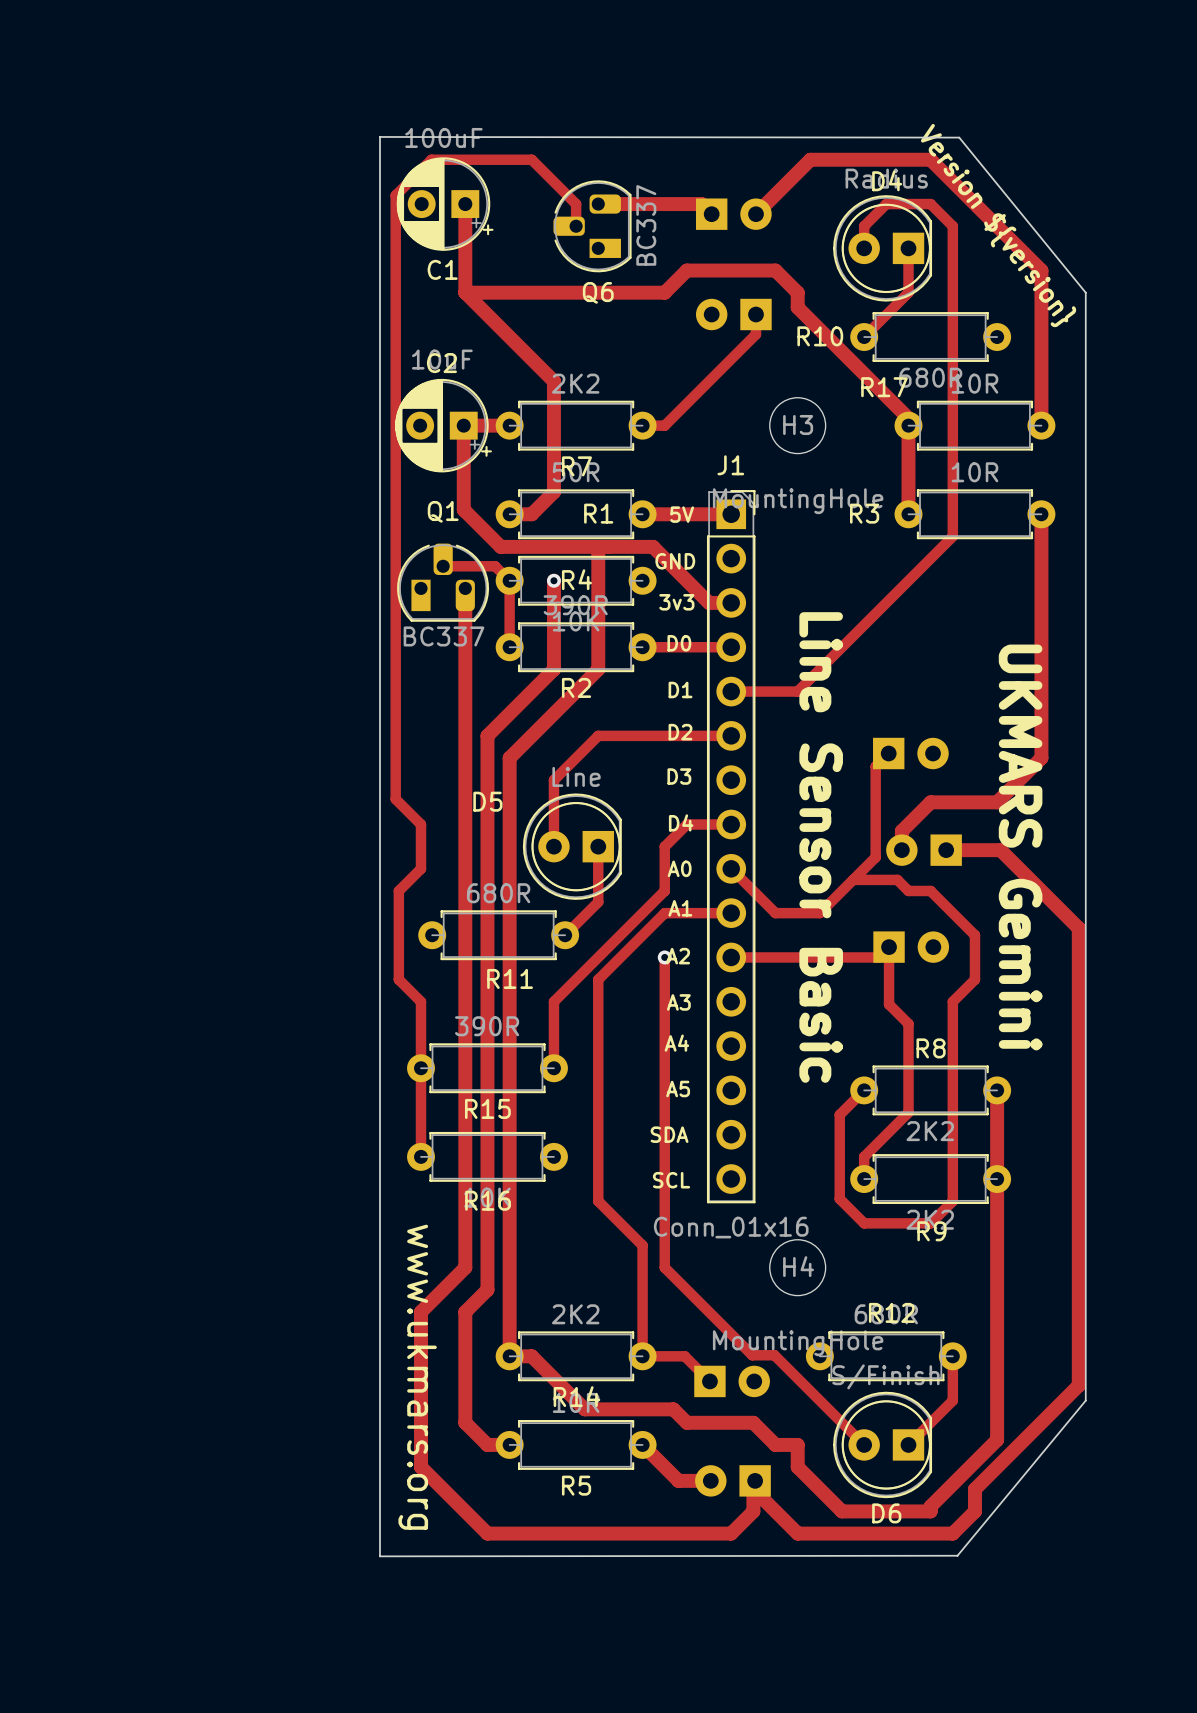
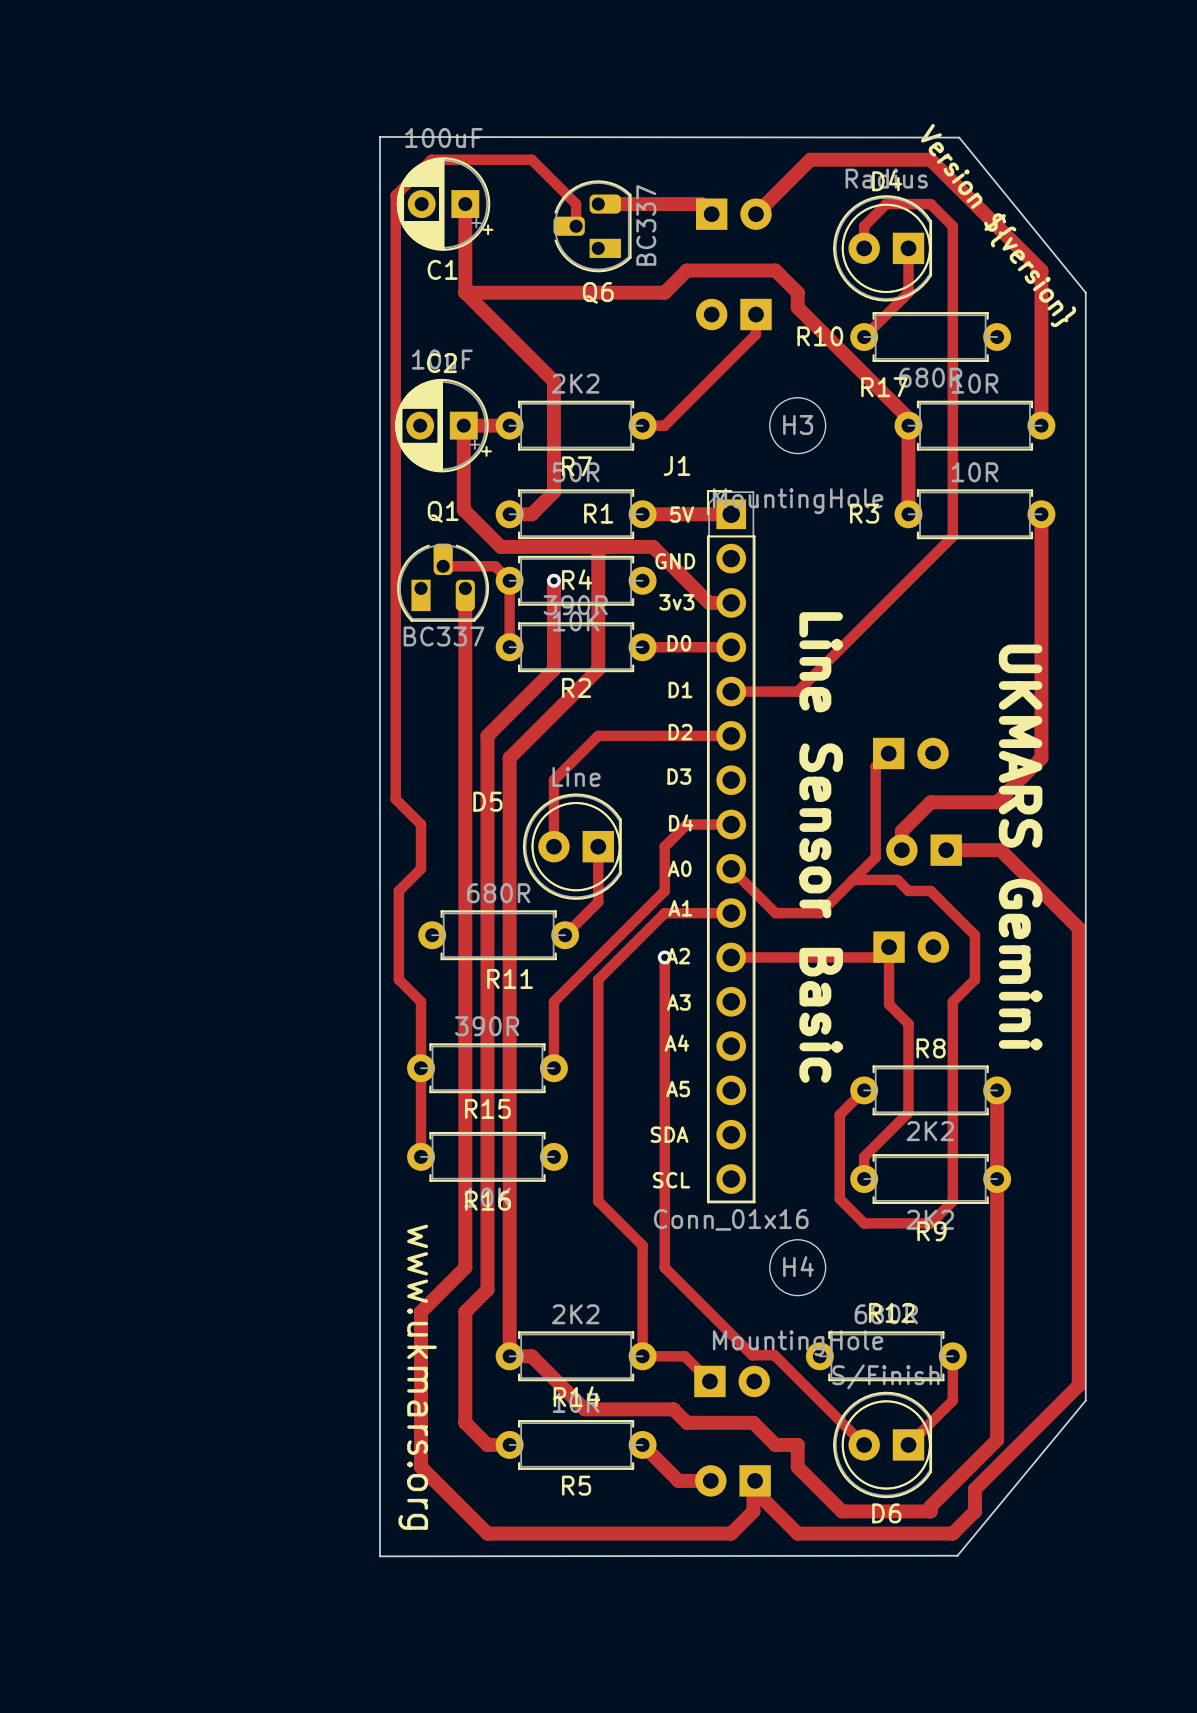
J1 name position: J1 (730, 465) -> J1 (676, 465)
J1 footprint: [706, 490, 756, 1204] -> [706, 490, 756, 1204]

